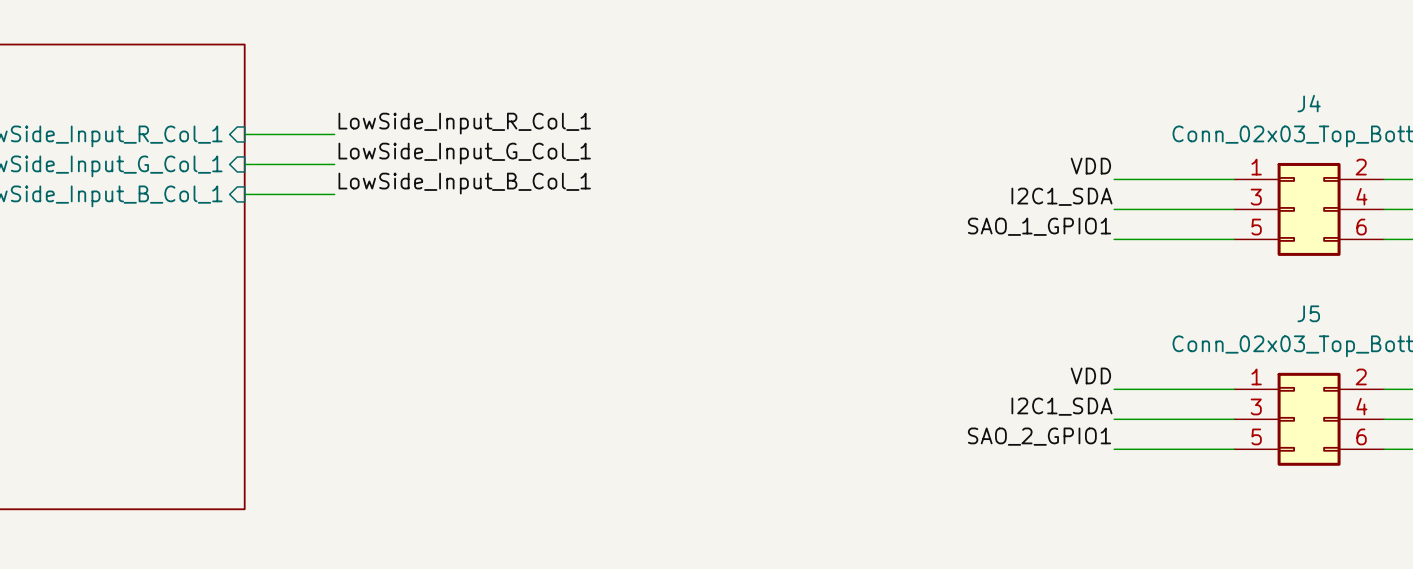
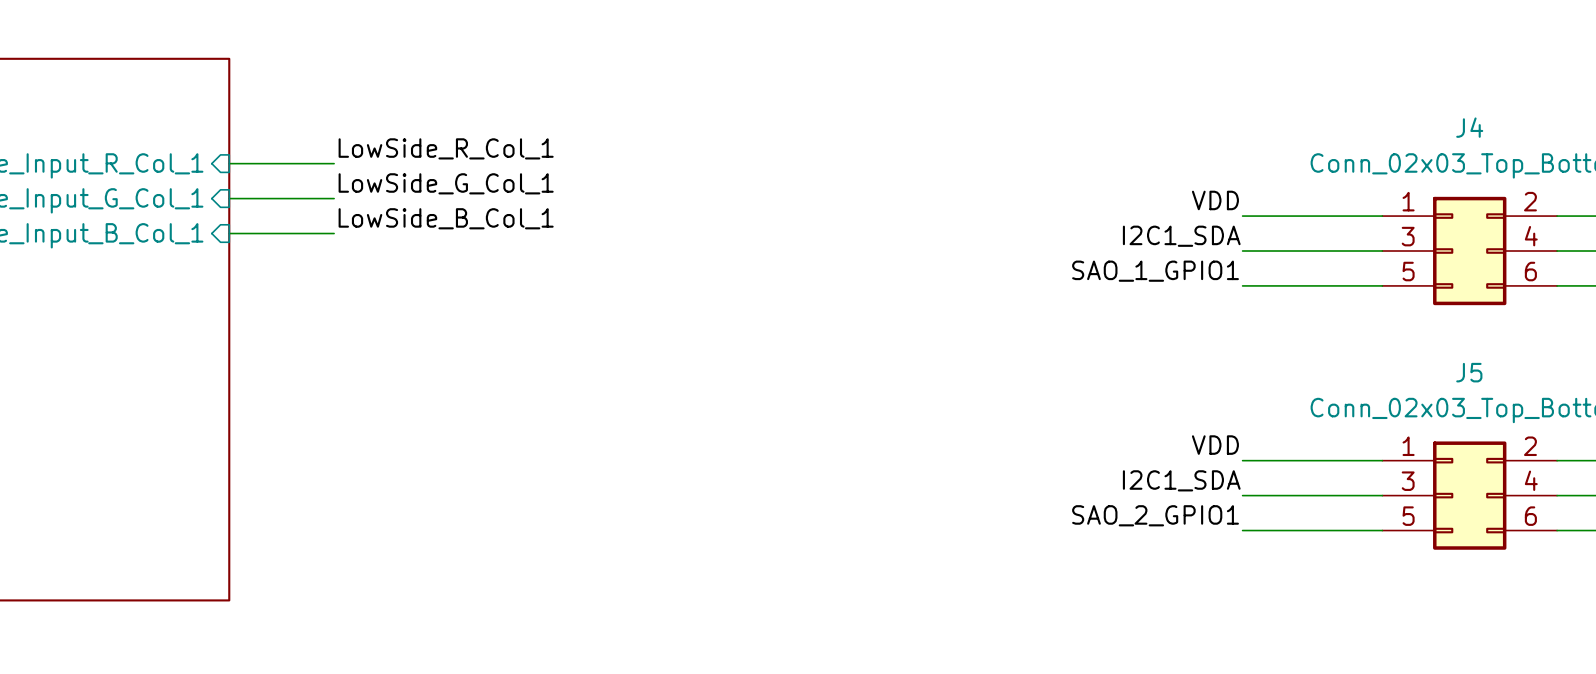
label: LowSide_Input_R_Col_1 (464, 123) -> LowSide_R_Col_1 (446, 148)
label: LowSide_Input_G_Col_1 (464, 153) -> LowSide_G_Col_1 (446, 183)
label: LowSide_Input_B_Col_1 (464, 183) -> LowSide_B_Col_1 (446, 218)

